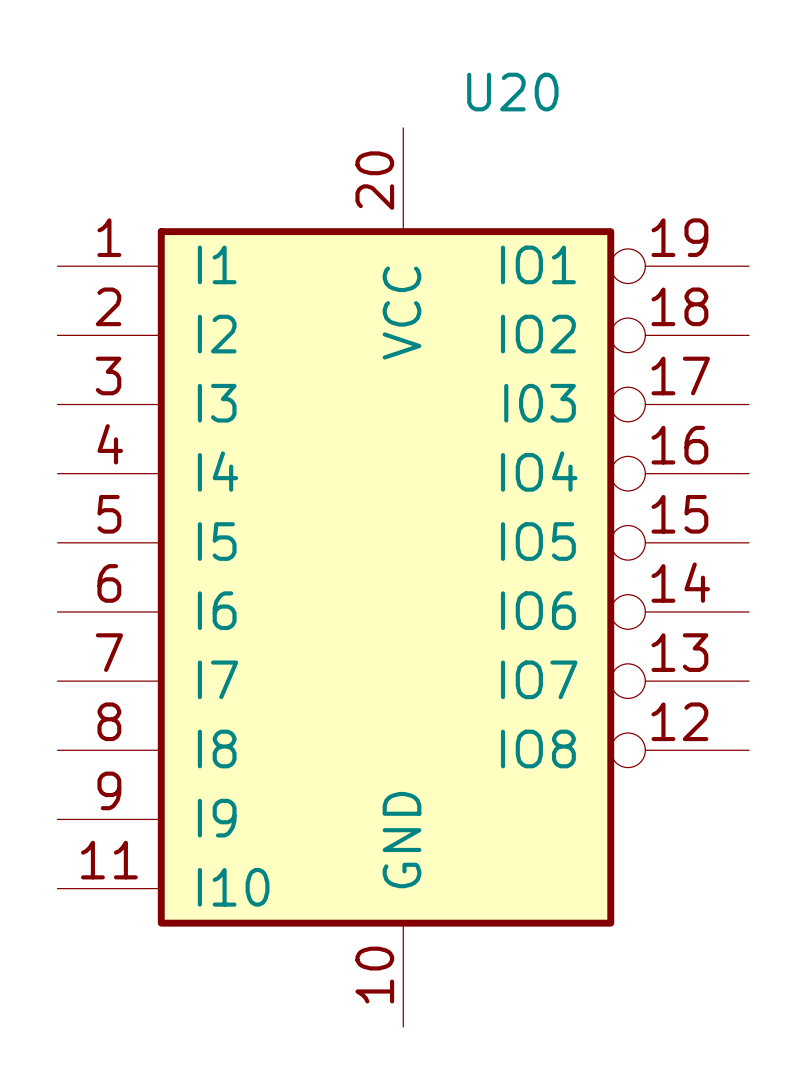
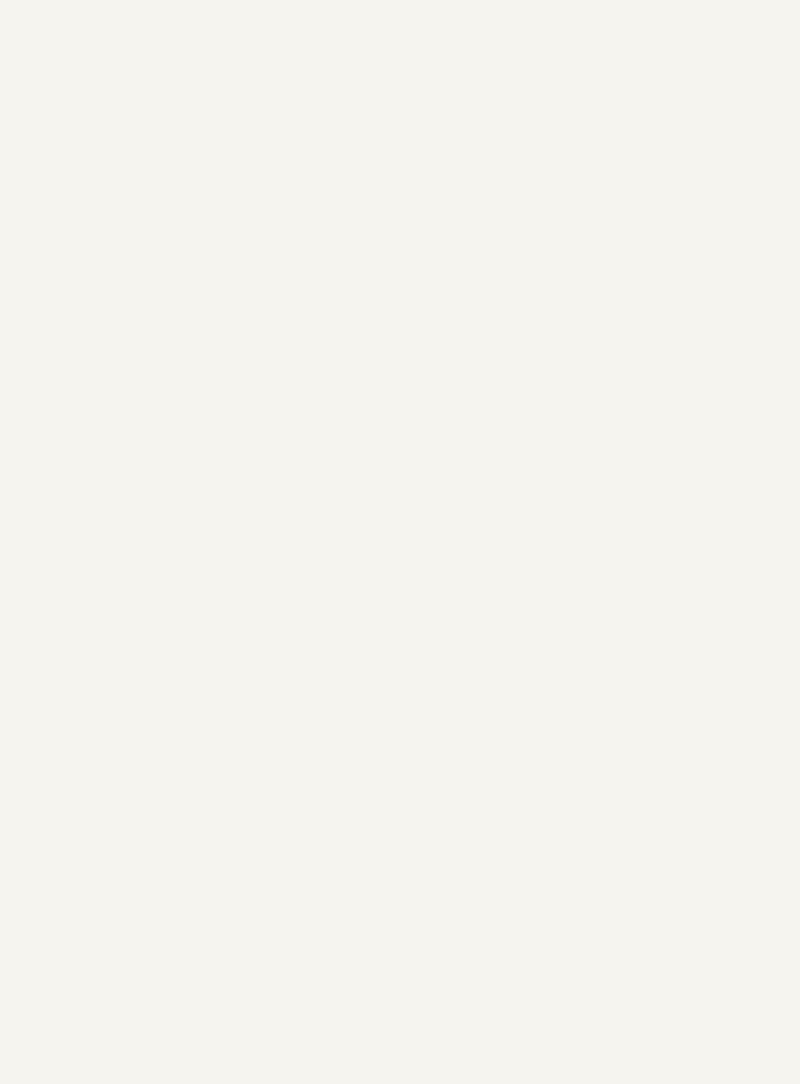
U20: (403, 577) -> none

